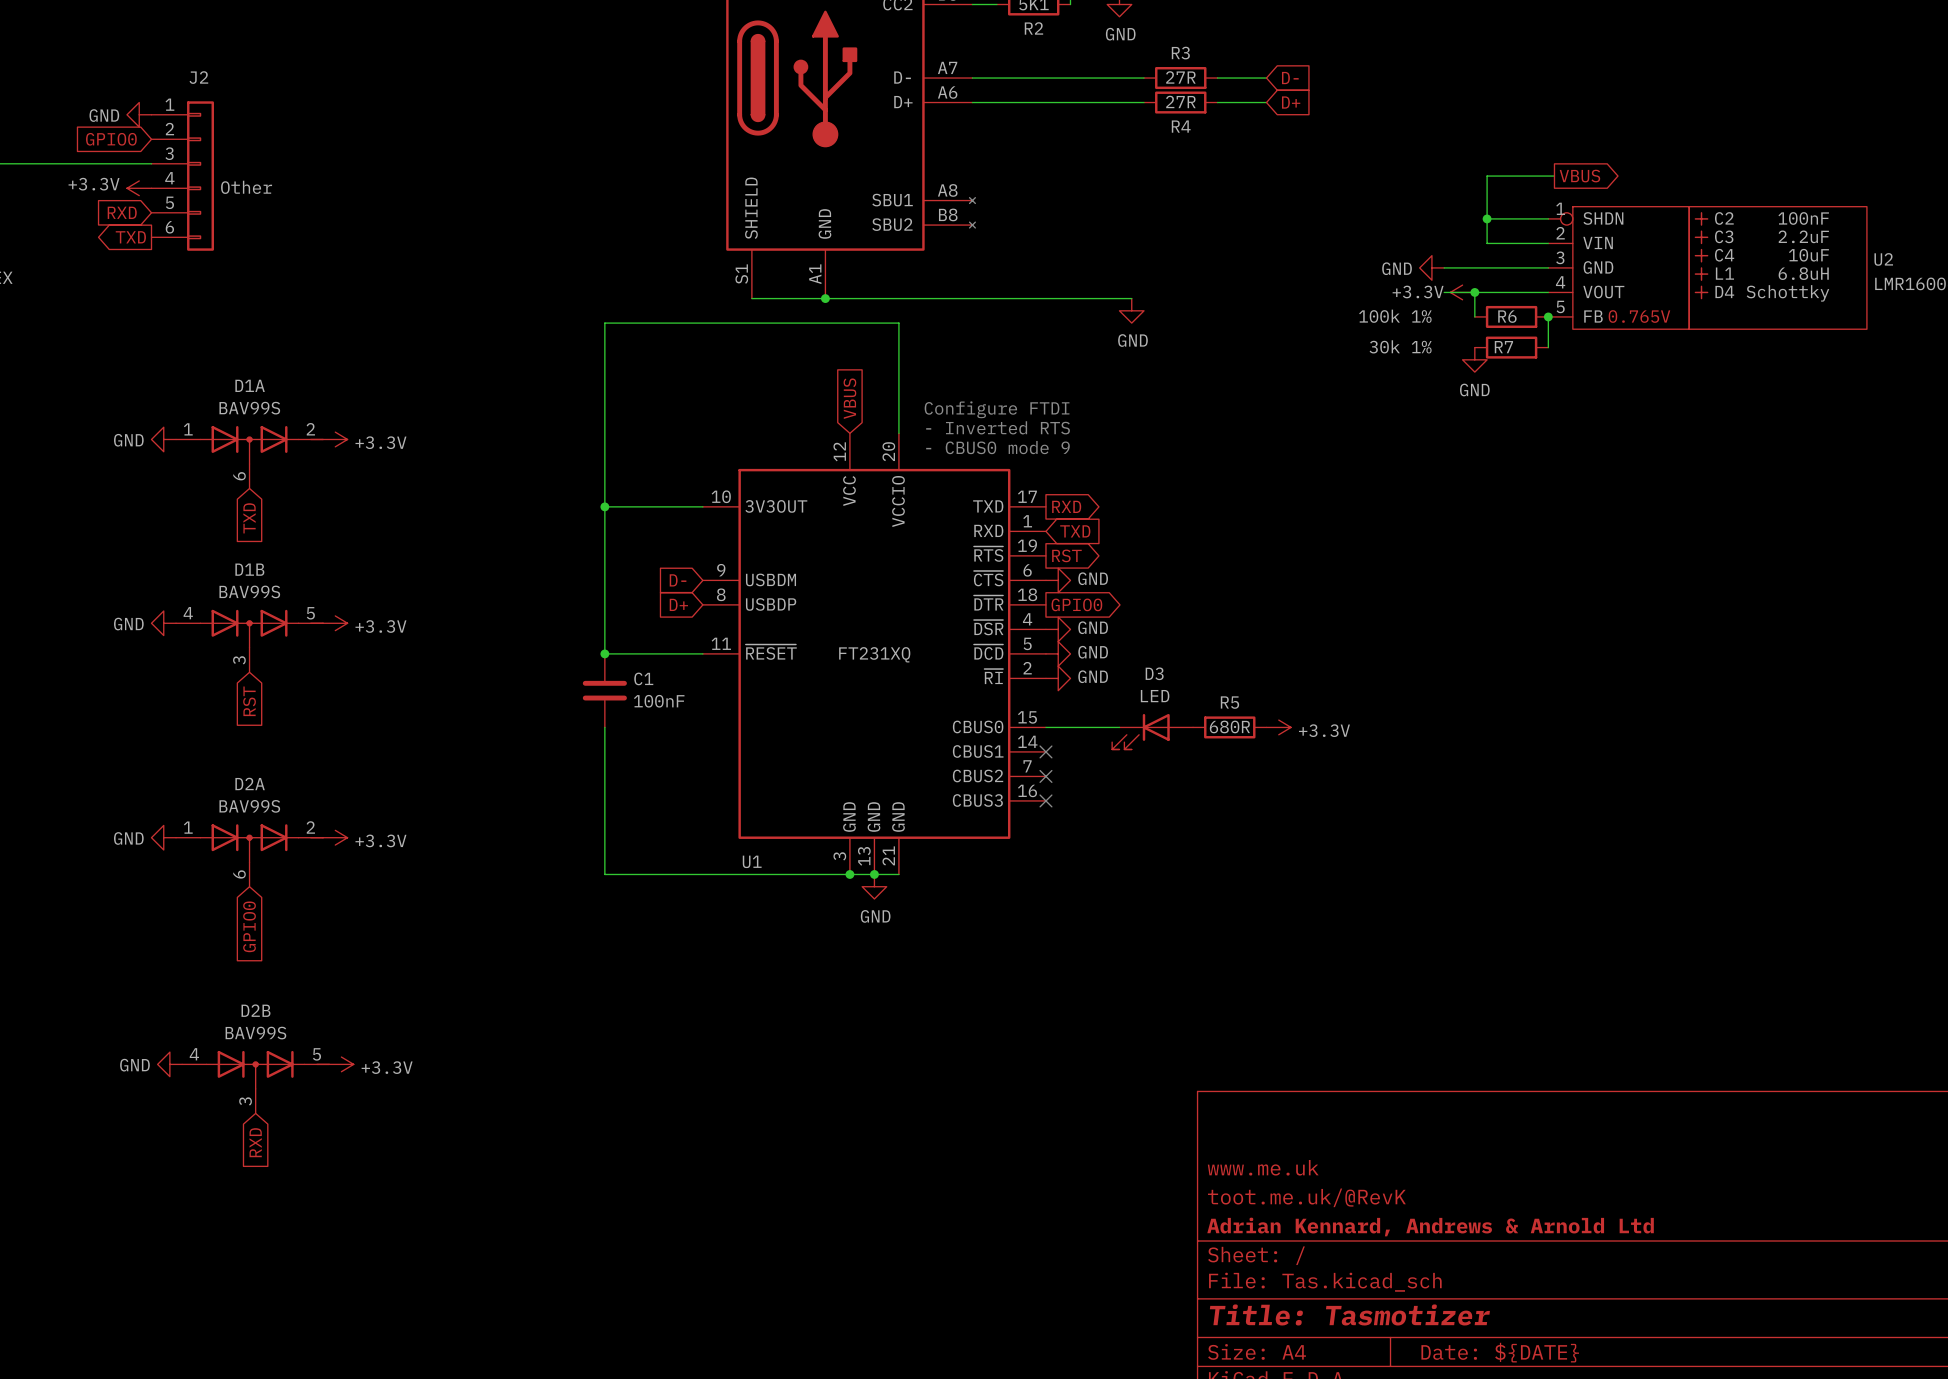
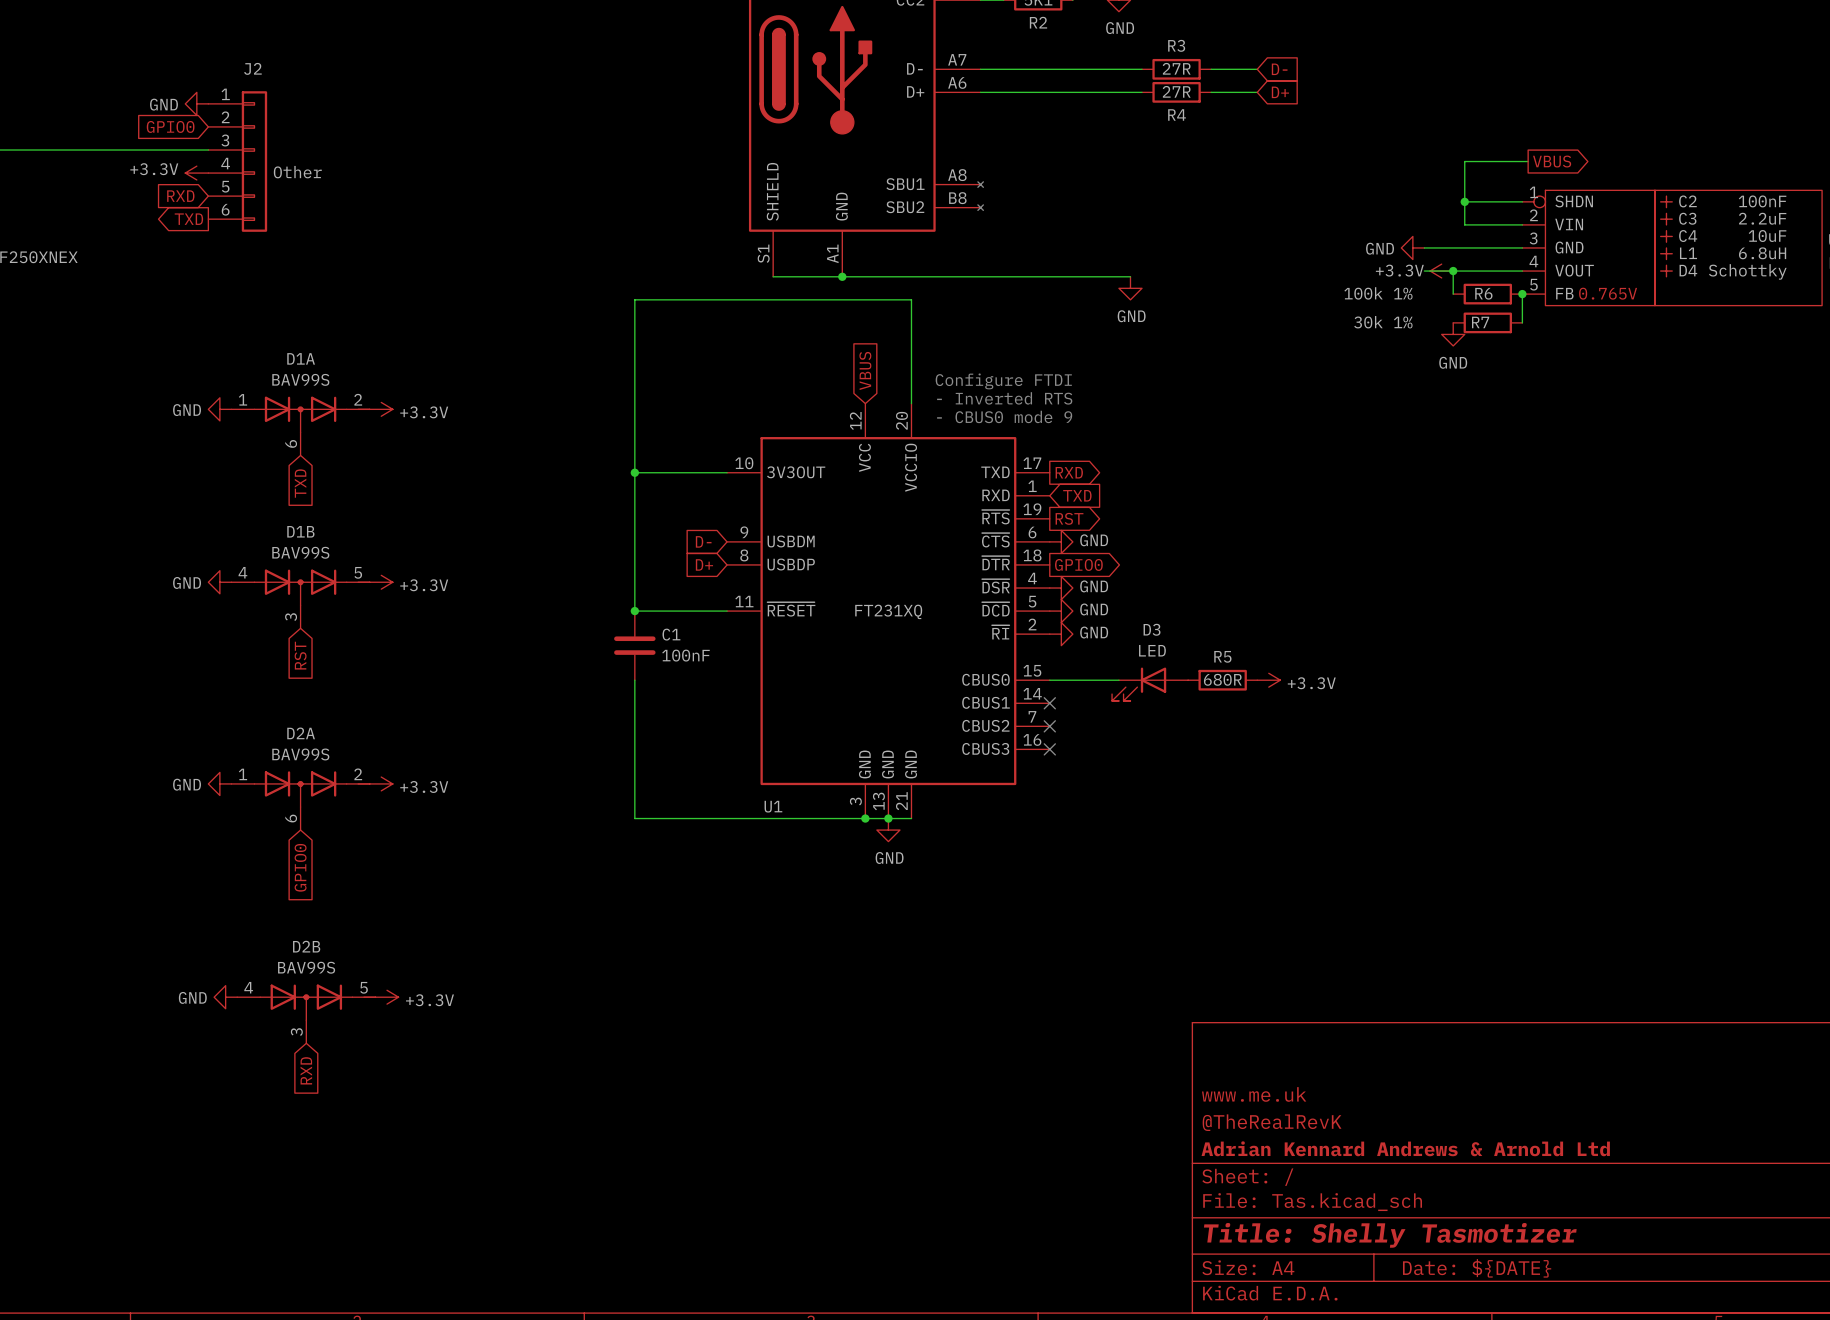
title block: toot.me.uk/@RevK (1306, 1197) -> @TheRealRevK (1272, 1122)
title block: Adrian Kennard, Andrews & Arnold Ltd (1430, 1227) -> Adrian Kennard Andrews & Arnold Ltd (1405, 1148)
title block: Title: Tasmotizer (1349, 1314) -> Title: Shelly Tasmotizer (1390, 1235)

